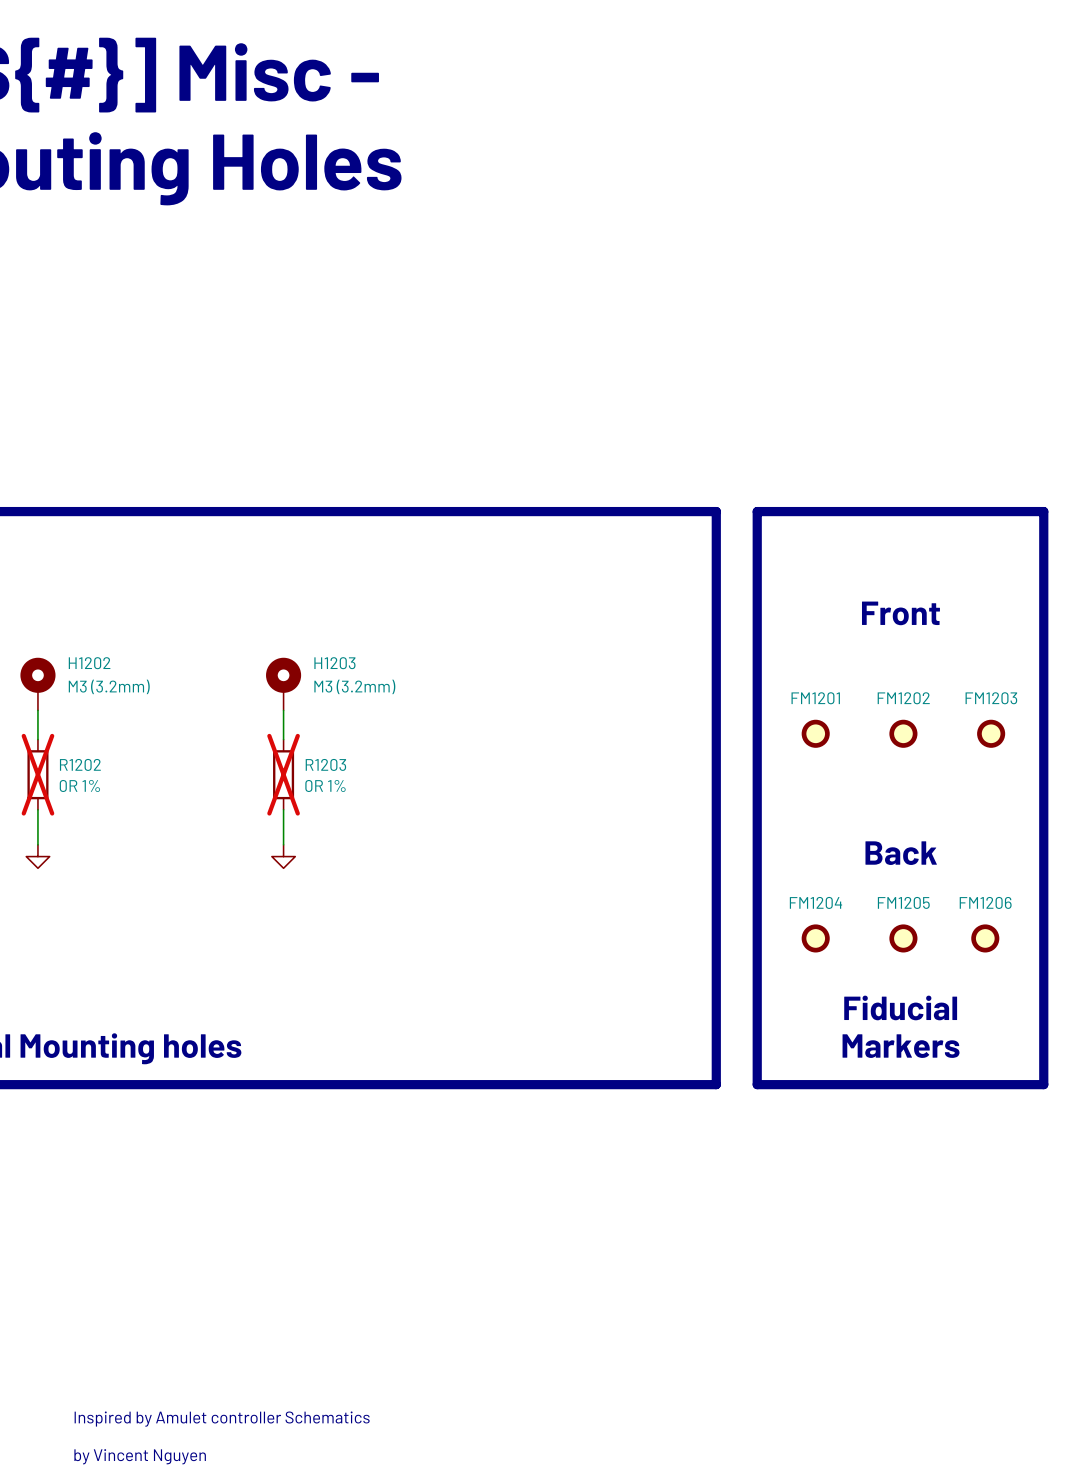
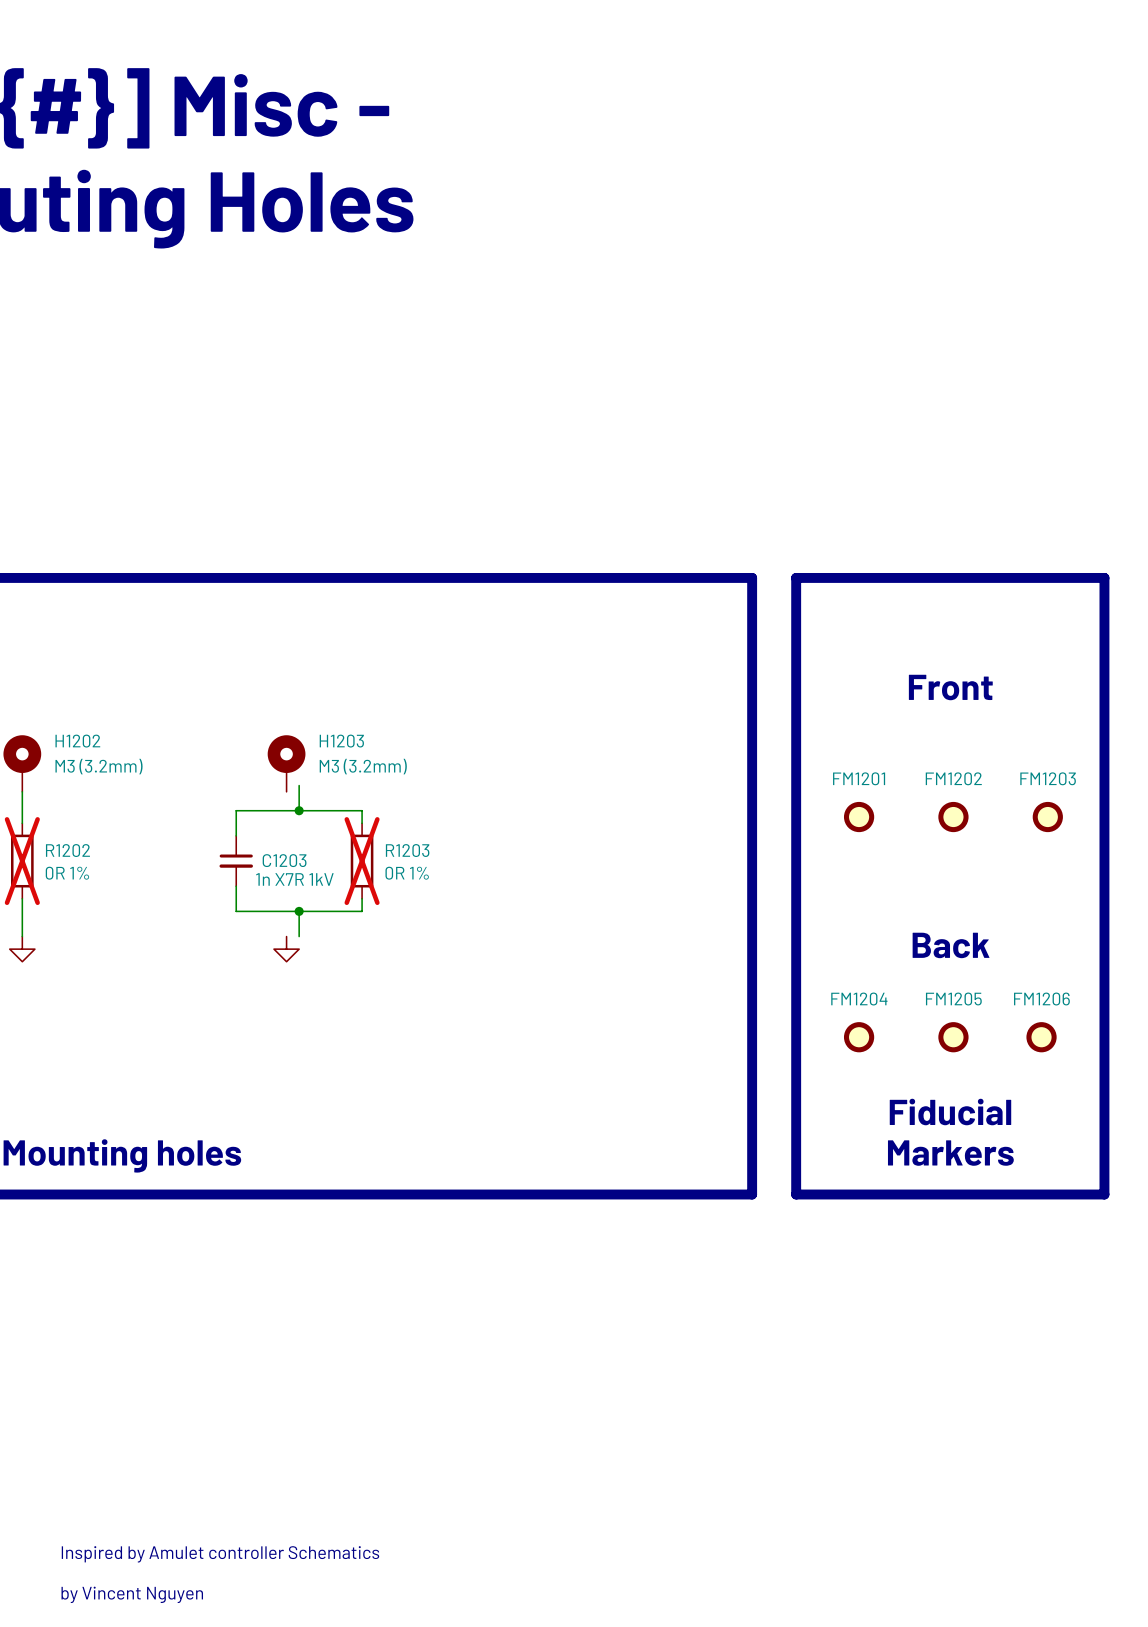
wire: none -> (299, 785) (299, 810)
wire: (283, 710) (283, 739) -> none
junction: none -> (299, 810)
wire: none -> (362, 823) (362, 810) (236, 810) (236, 835)
C1203: none -> 1n X7R 1kV (236, 861)
R1203 position: (283, 774) -> (362, 861)
wire: none -> (236, 886) (236, 911) (362, 911) (362, 898)
wire: (283, 809) (283, 844) -> none
wire: none -> (299, 911) (299, 936)
junction: none -> (299, 911)

